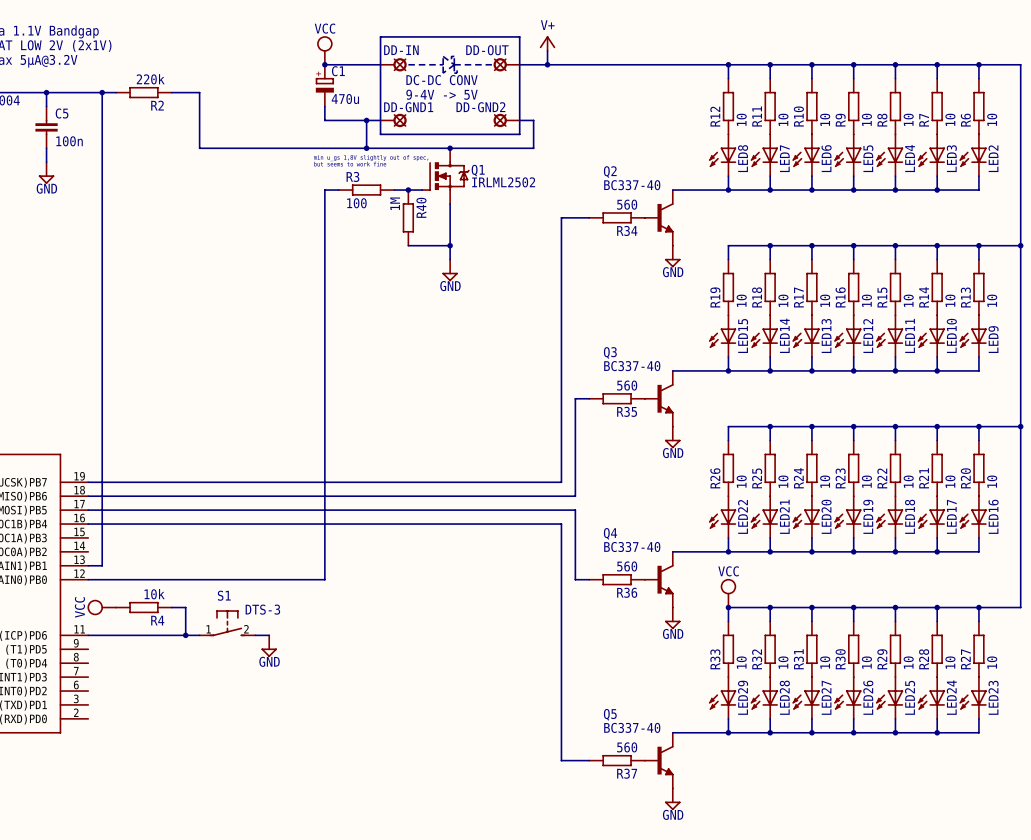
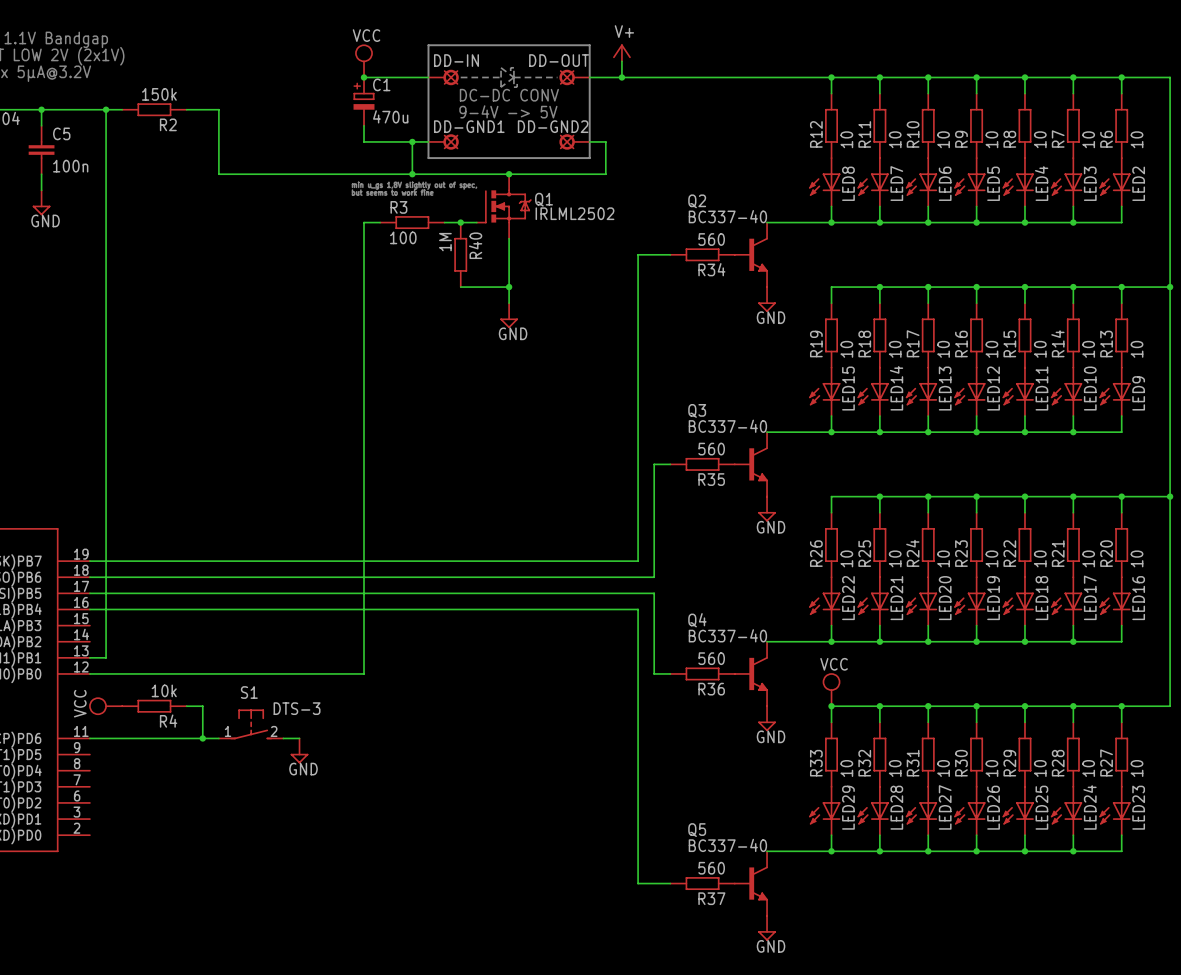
R2 value: 220k (150, 79) -> 150k (159, 94)

